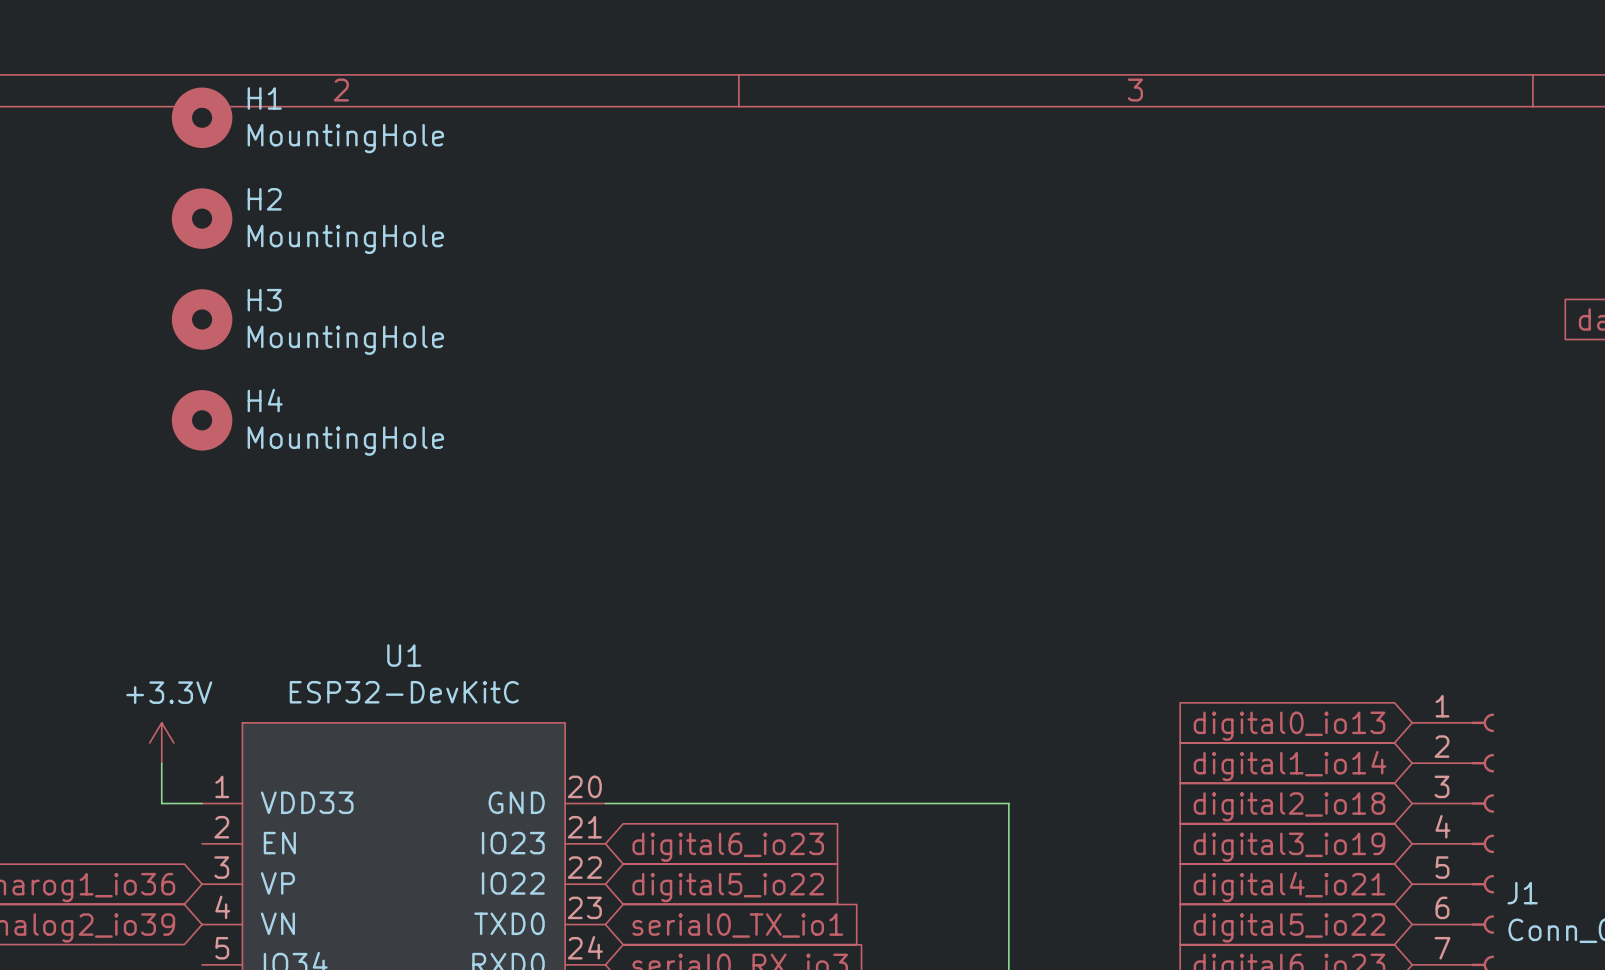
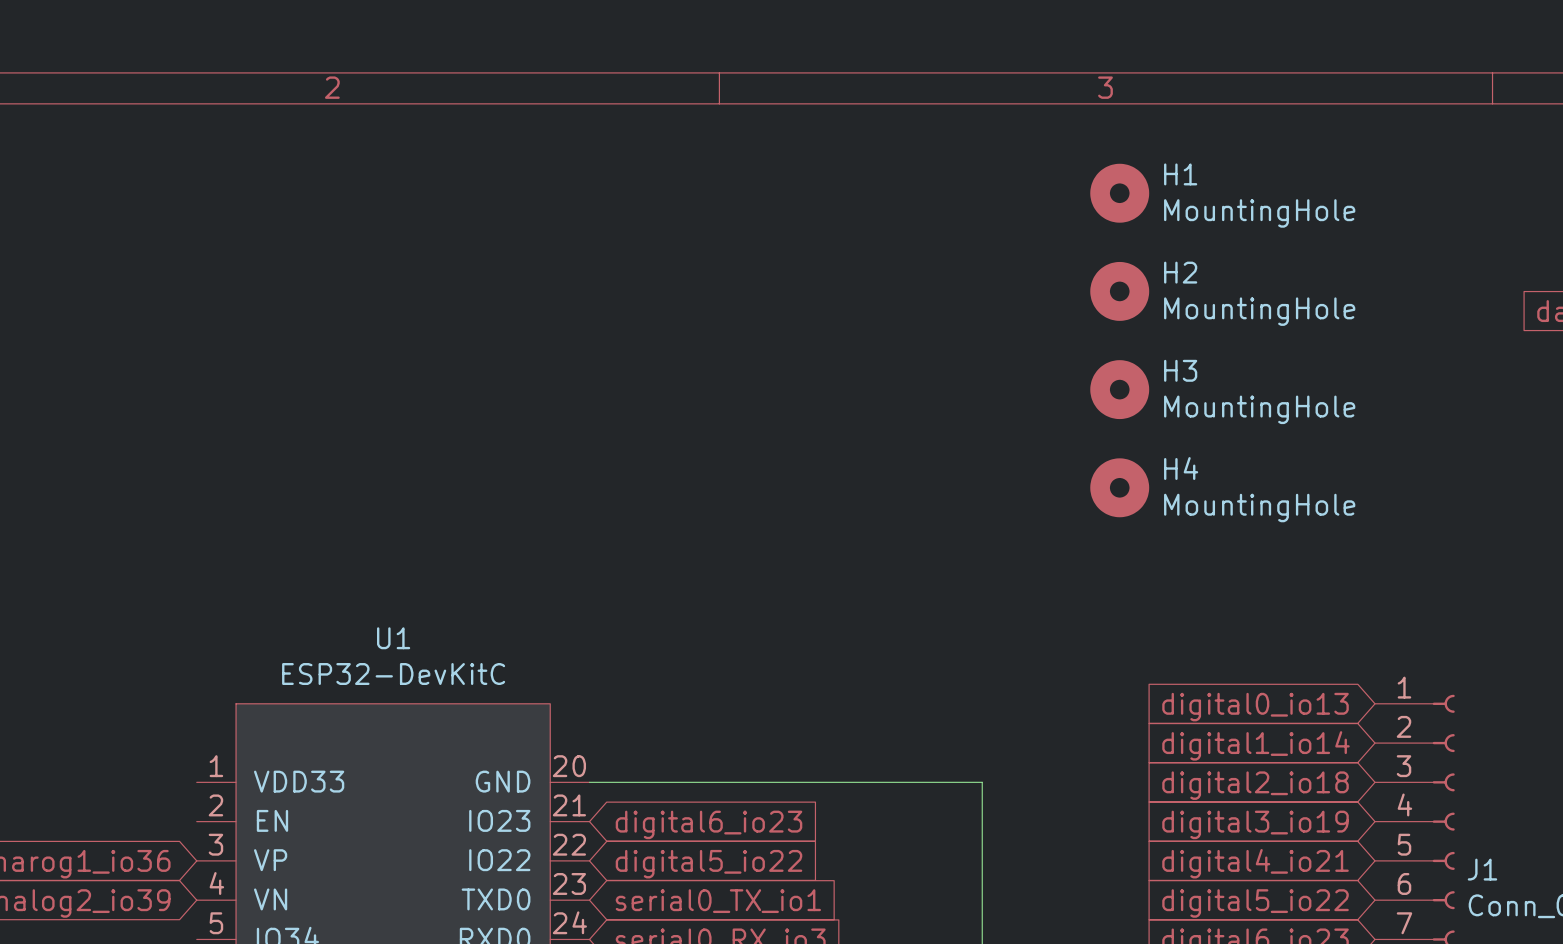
H1 position: (202, 117) -> (1119, 193)
H2 position: (202, 218) -> (1119, 291)
H3 position: (202, 319) -> (1119, 389)
H4 position: (202, 420) -> (1119, 487)
power symbol: +3.3V (161, 743) -> none
wire: (161, 763) (161, 803) (202, 803) -> none

